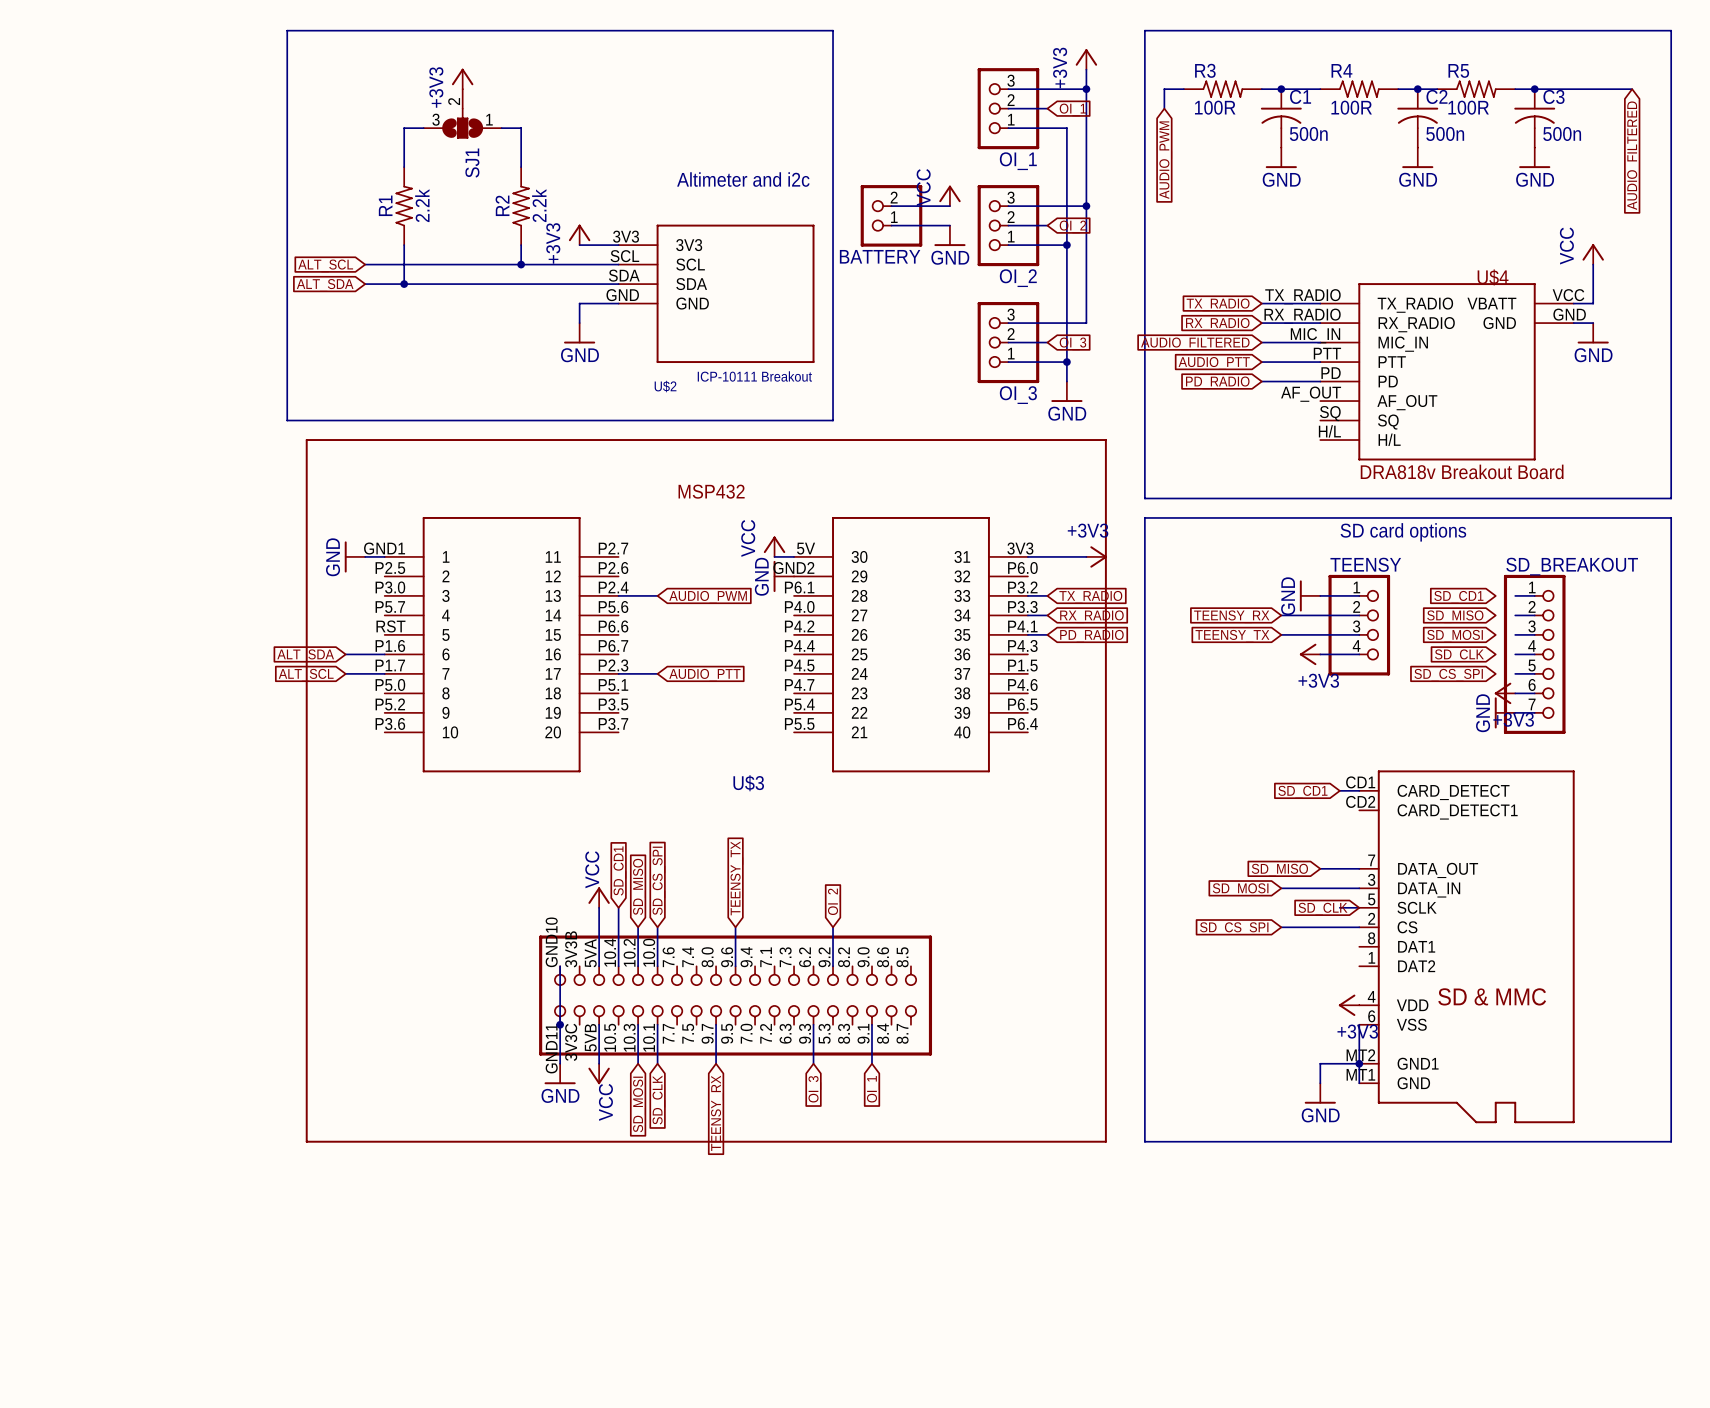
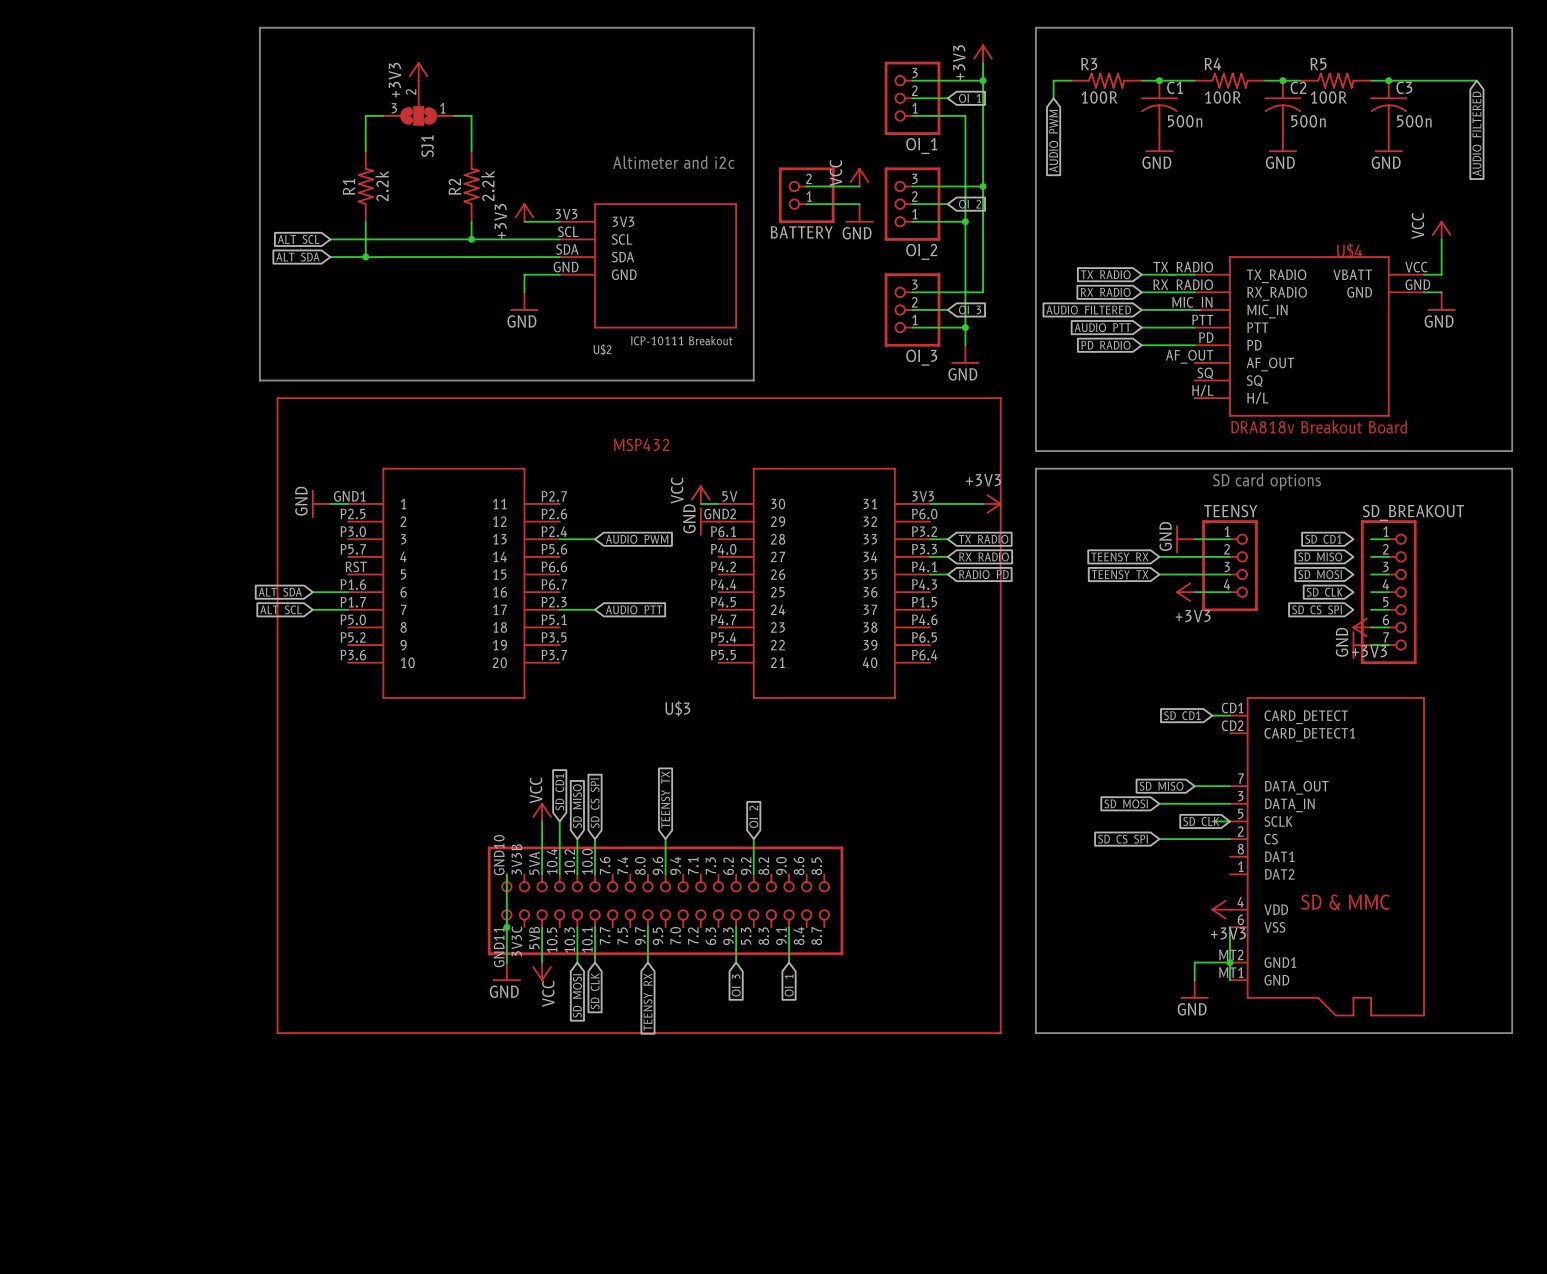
global label: PD_RADIO (1091, 636) -> RADIO_PD (983, 575)

